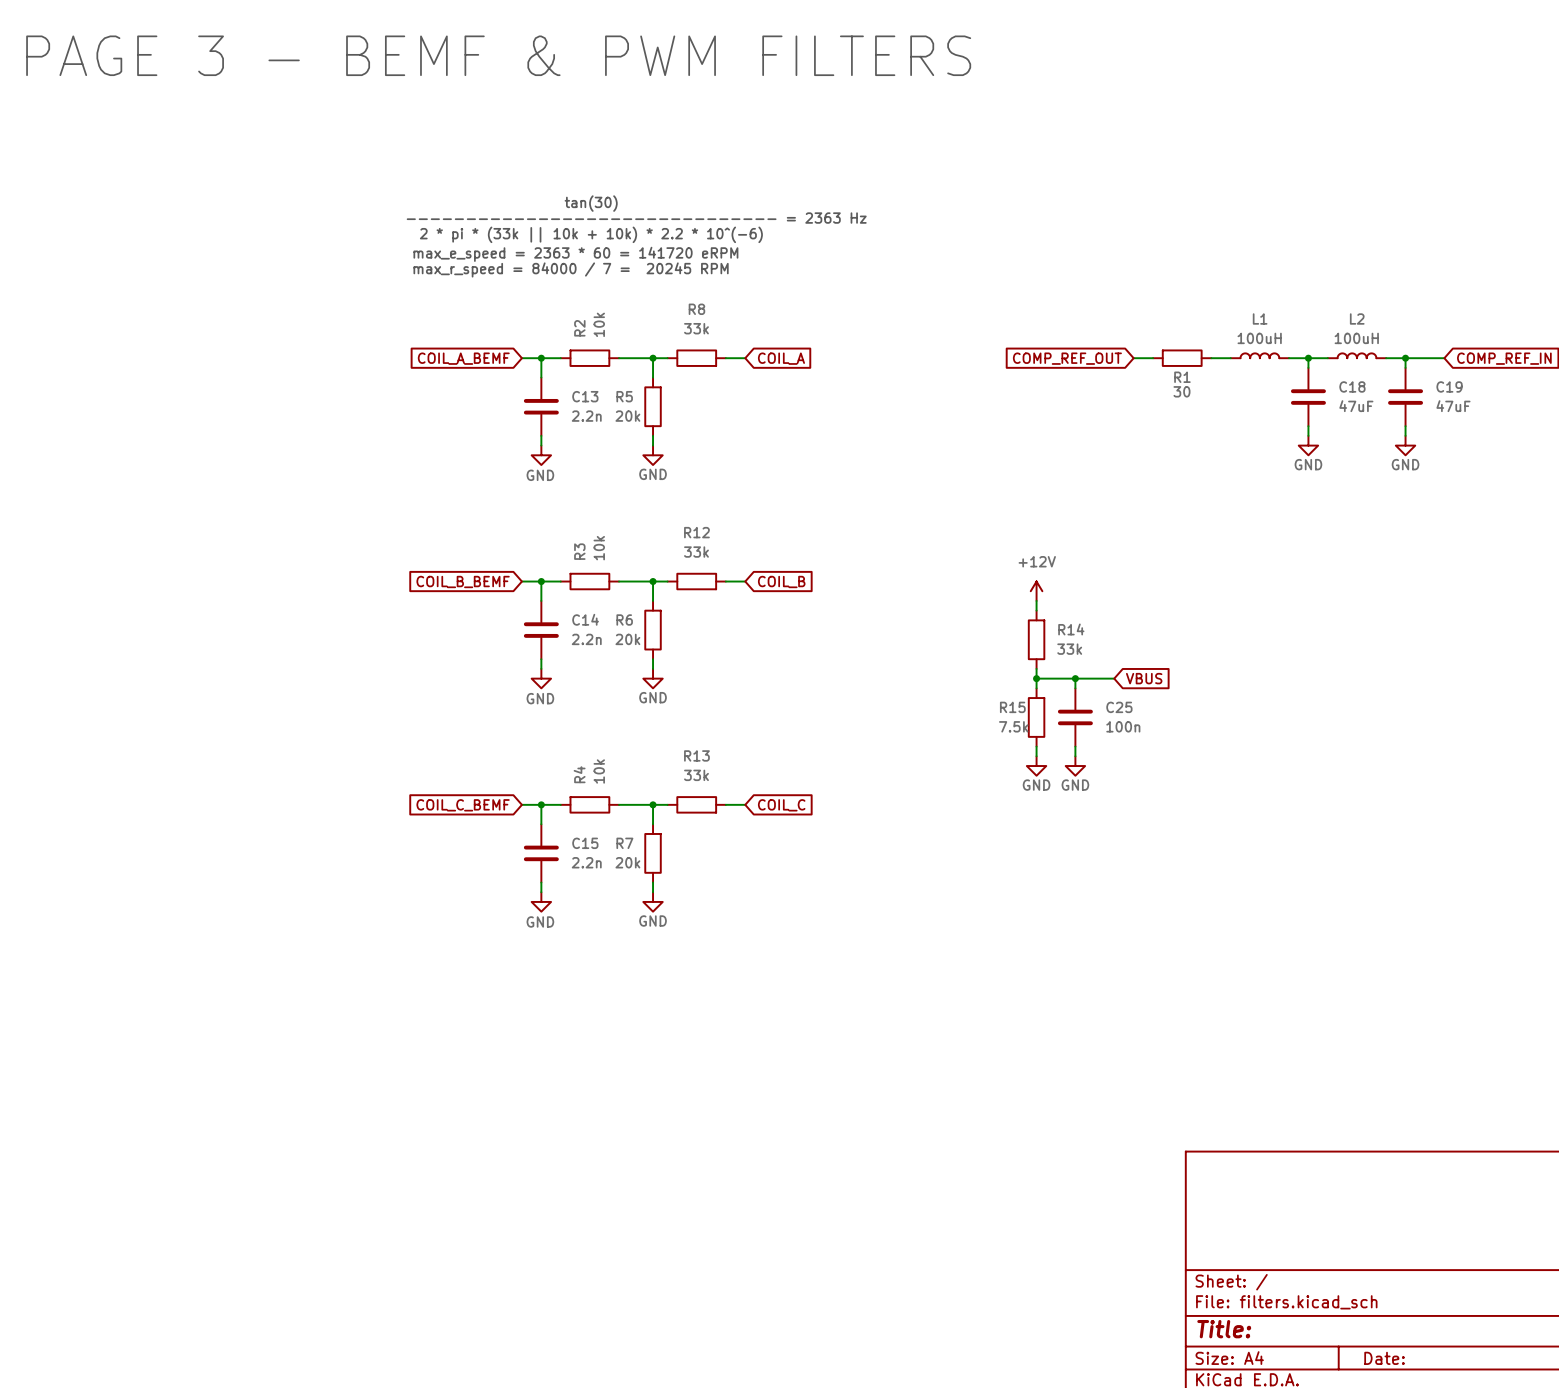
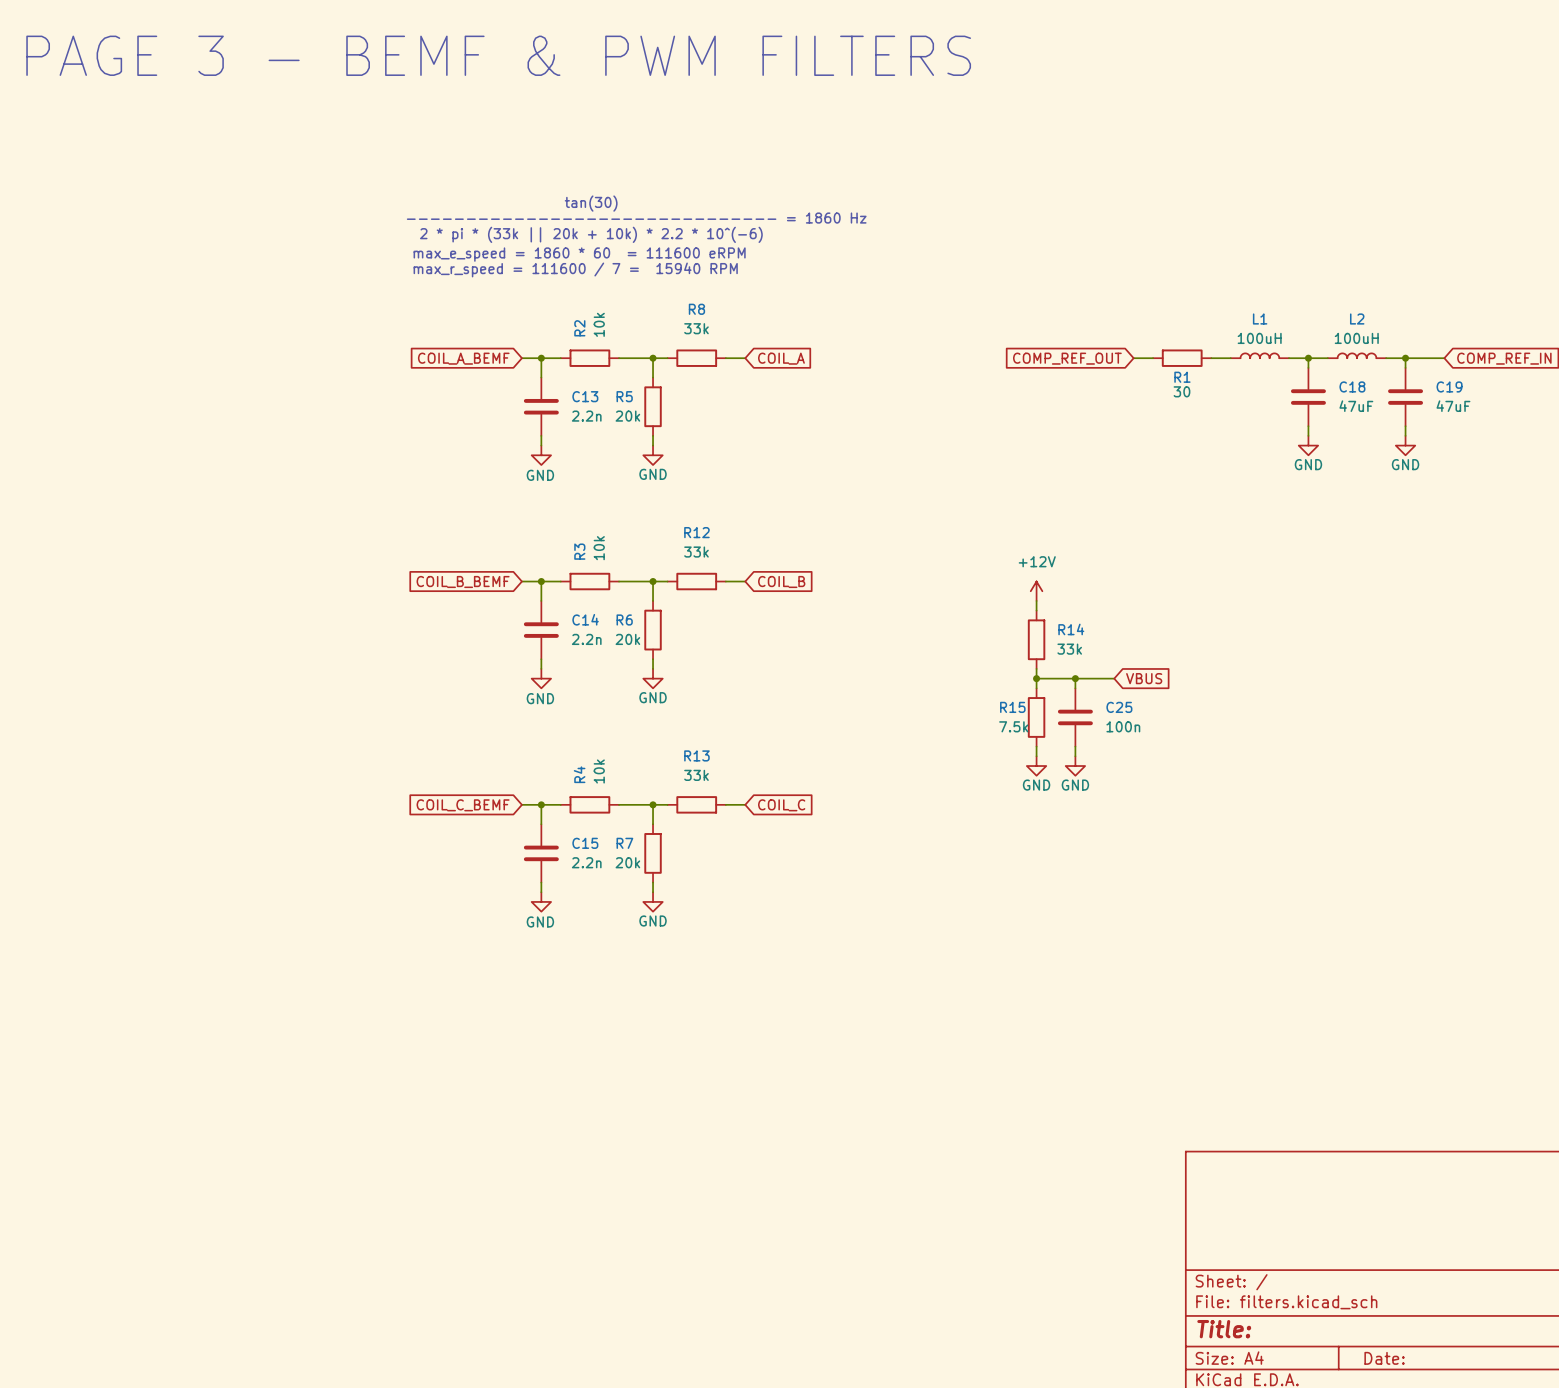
text: ------------------------------- = 2363 Hz (636, 218) -> ------------------------------- = 1860 Hz (636, 218)
text: 2 * pi * (33k || 10k + 10k) * 2.2 * 10^(-6) (591, 234) -> 2 * pi * (33k || 20k + 10k) * 2.2 * 10^(-6) (591, 234)
text: max_e_speed = 2363 * 60 = 141720 eRPM (575, 254) -> max_e_speed = 1860 * 60 = 111600 eRPM (579, 254)
text: max_r_speed = 84000 / 7 = 20245 RPM (571, 269) -> max_r_speed = 111600 / 7 = 15940 RPM (575, 269)

